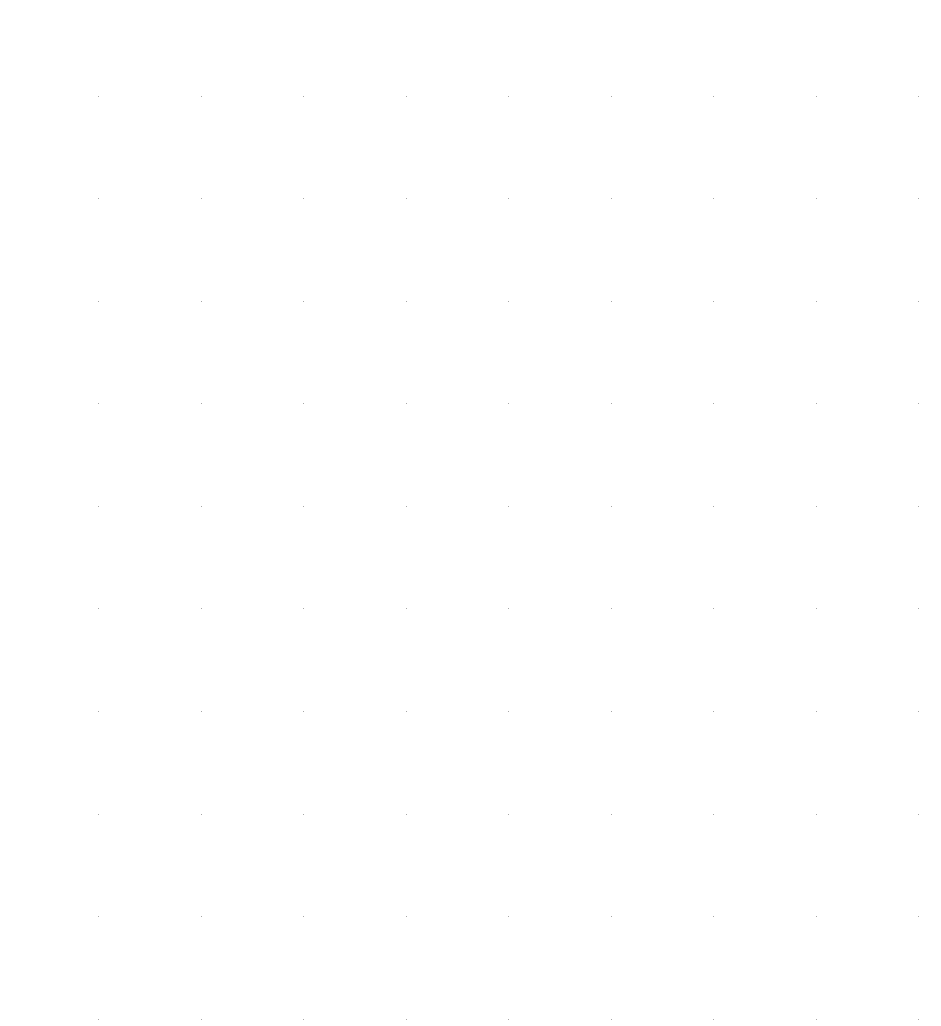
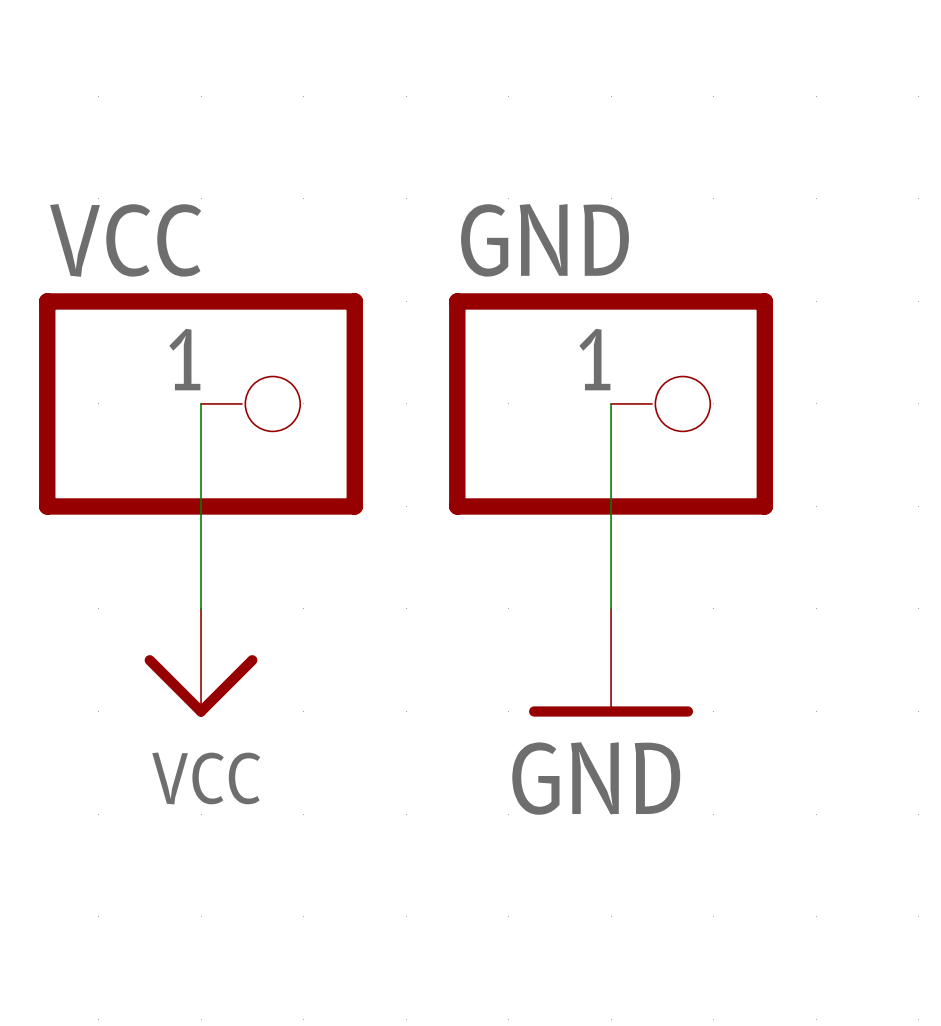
wire: none -> (201, 403) (201, 608)
VCC: none -> (201, 403)
wire: none -> (611, 403) (611, 608)
GND: none -> (611, 403)
power symbol: none -> VCC (201, 662)
power symbol: none -> GND (611, 662)

